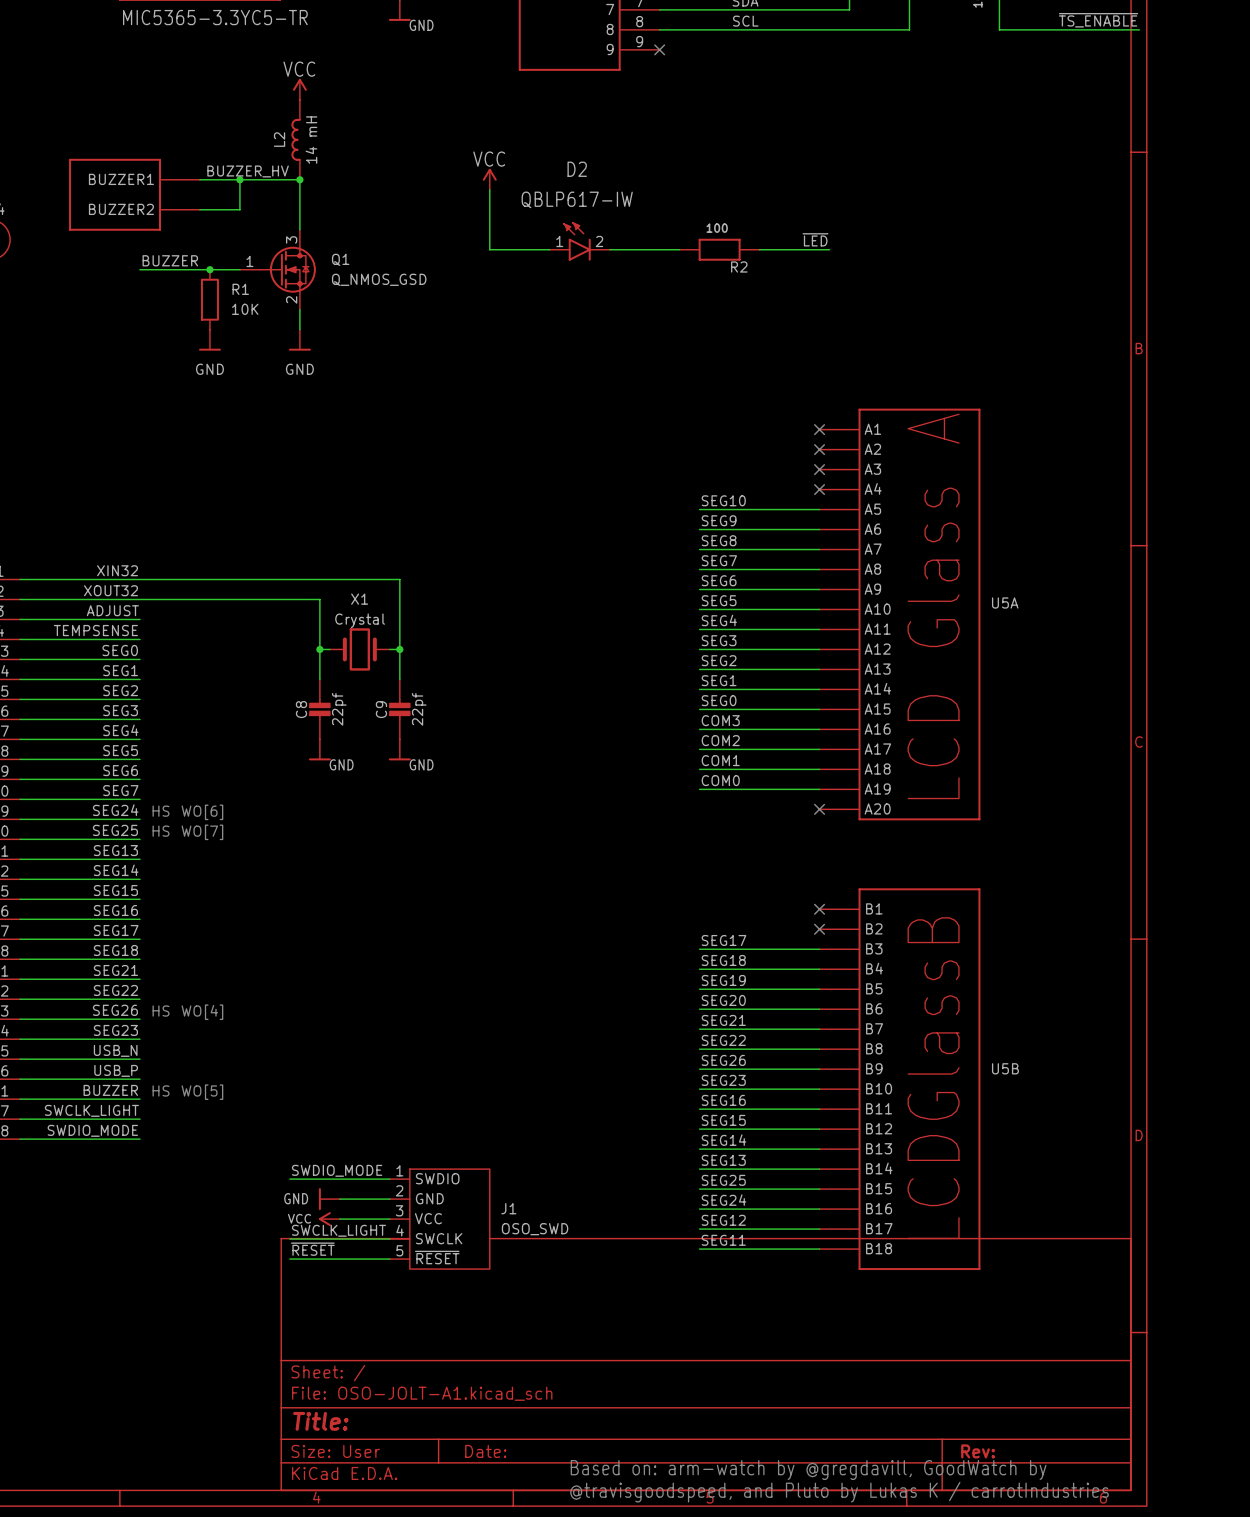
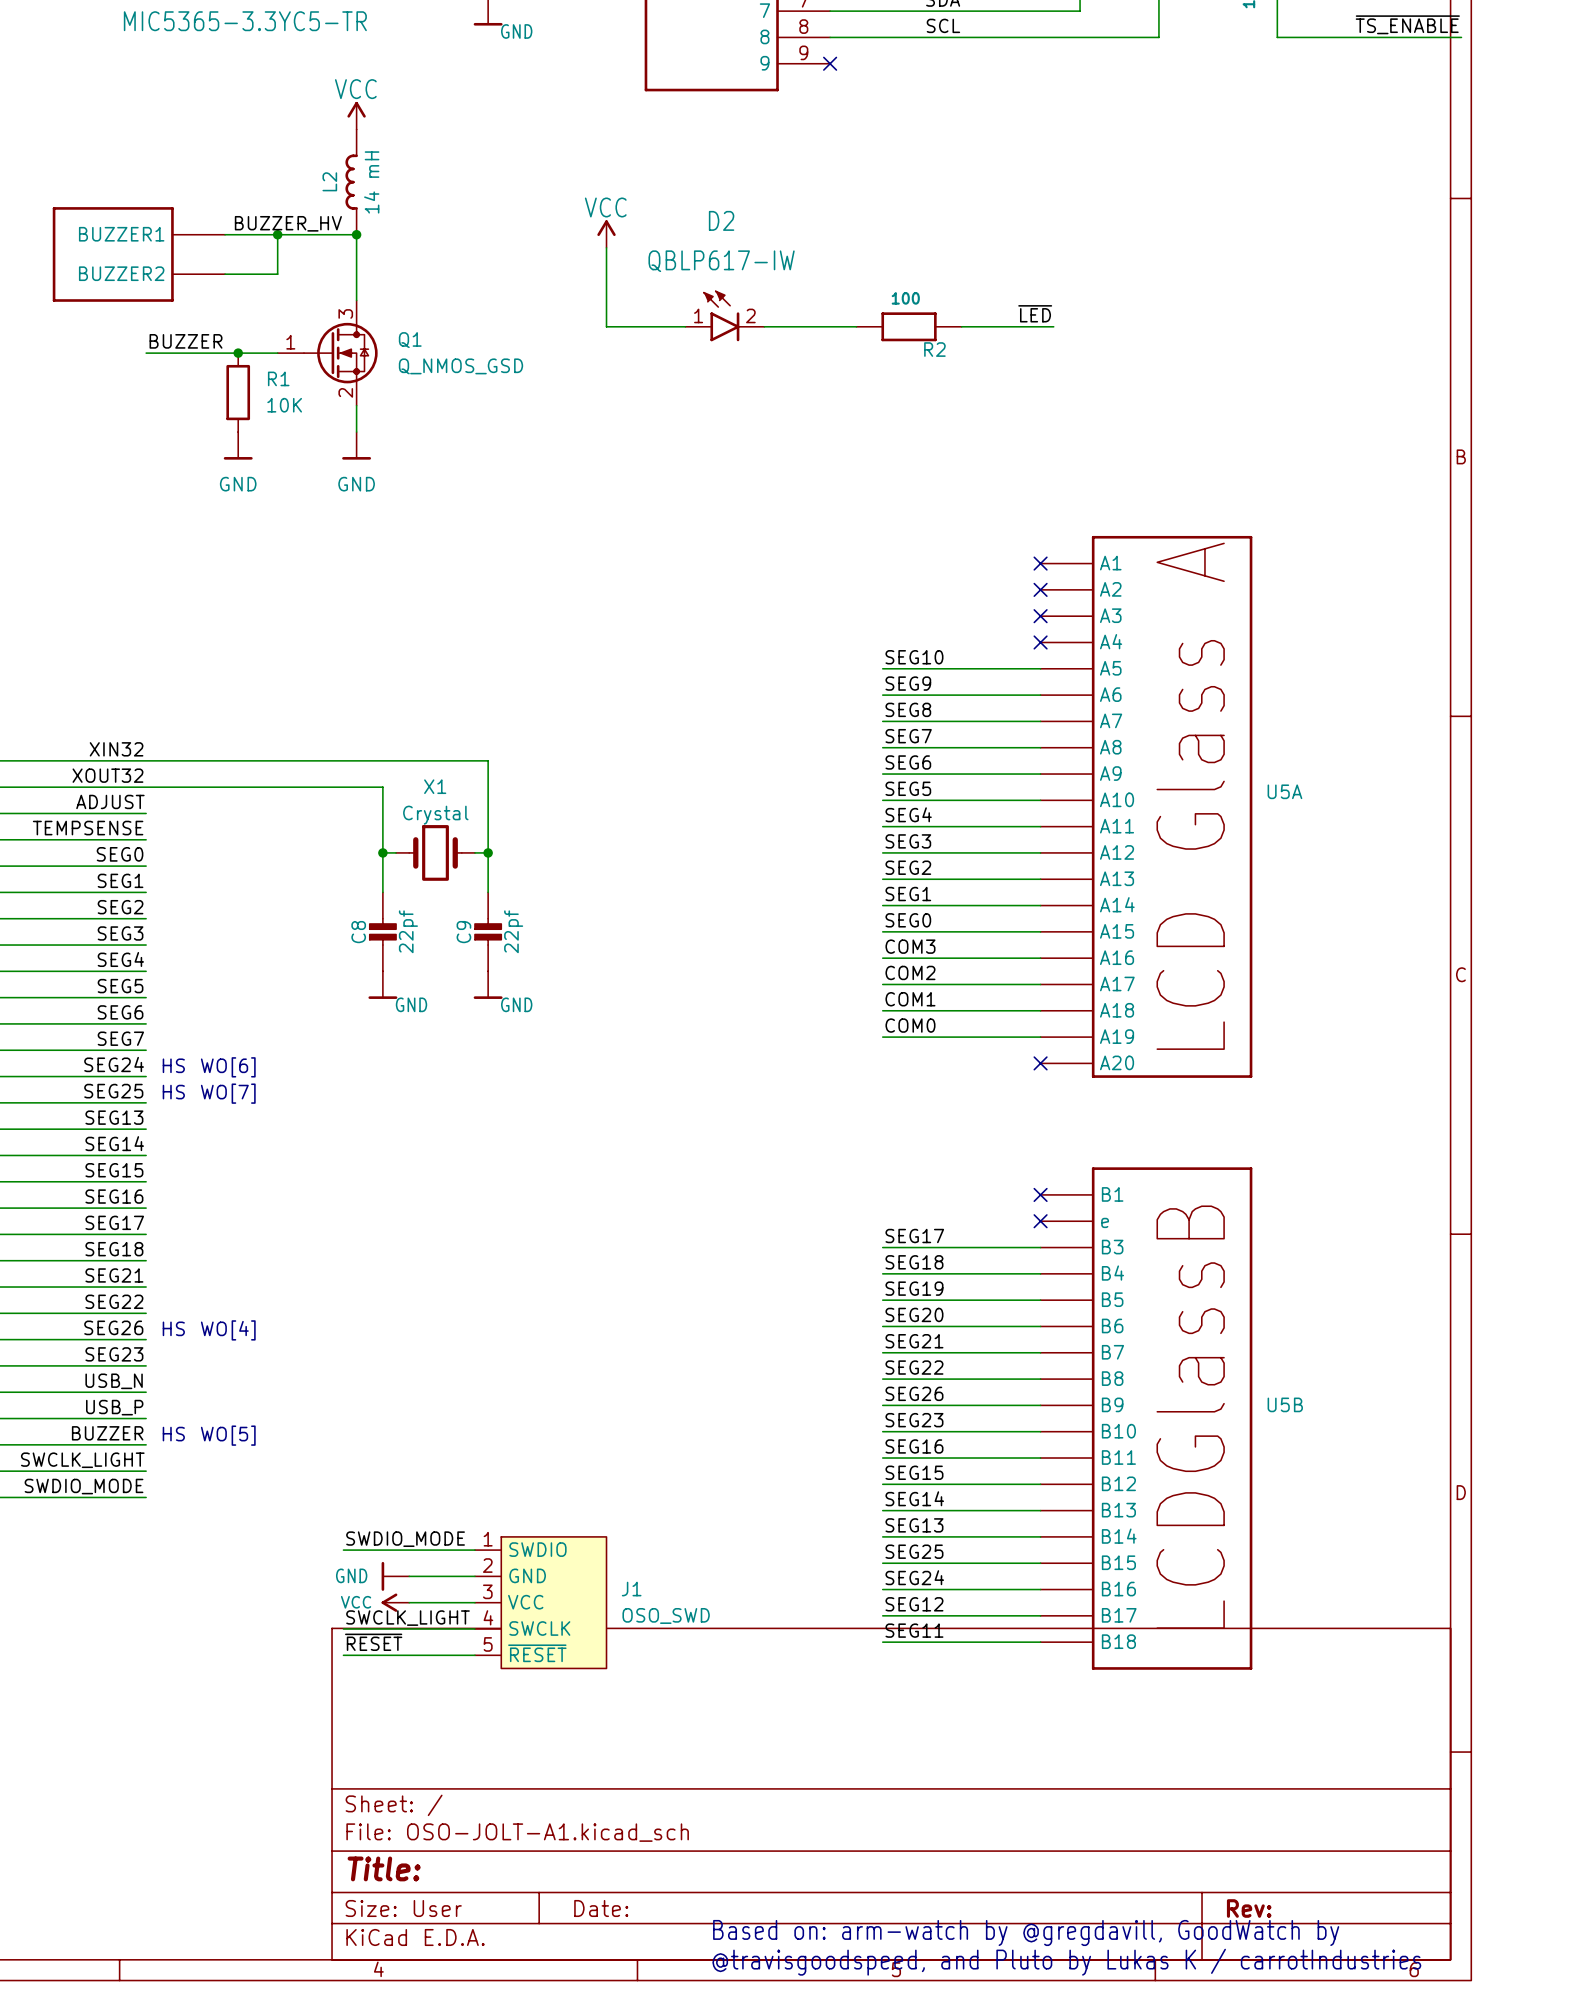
U5B pin name: B2 (874, 928) -> e (1105, 1222)

